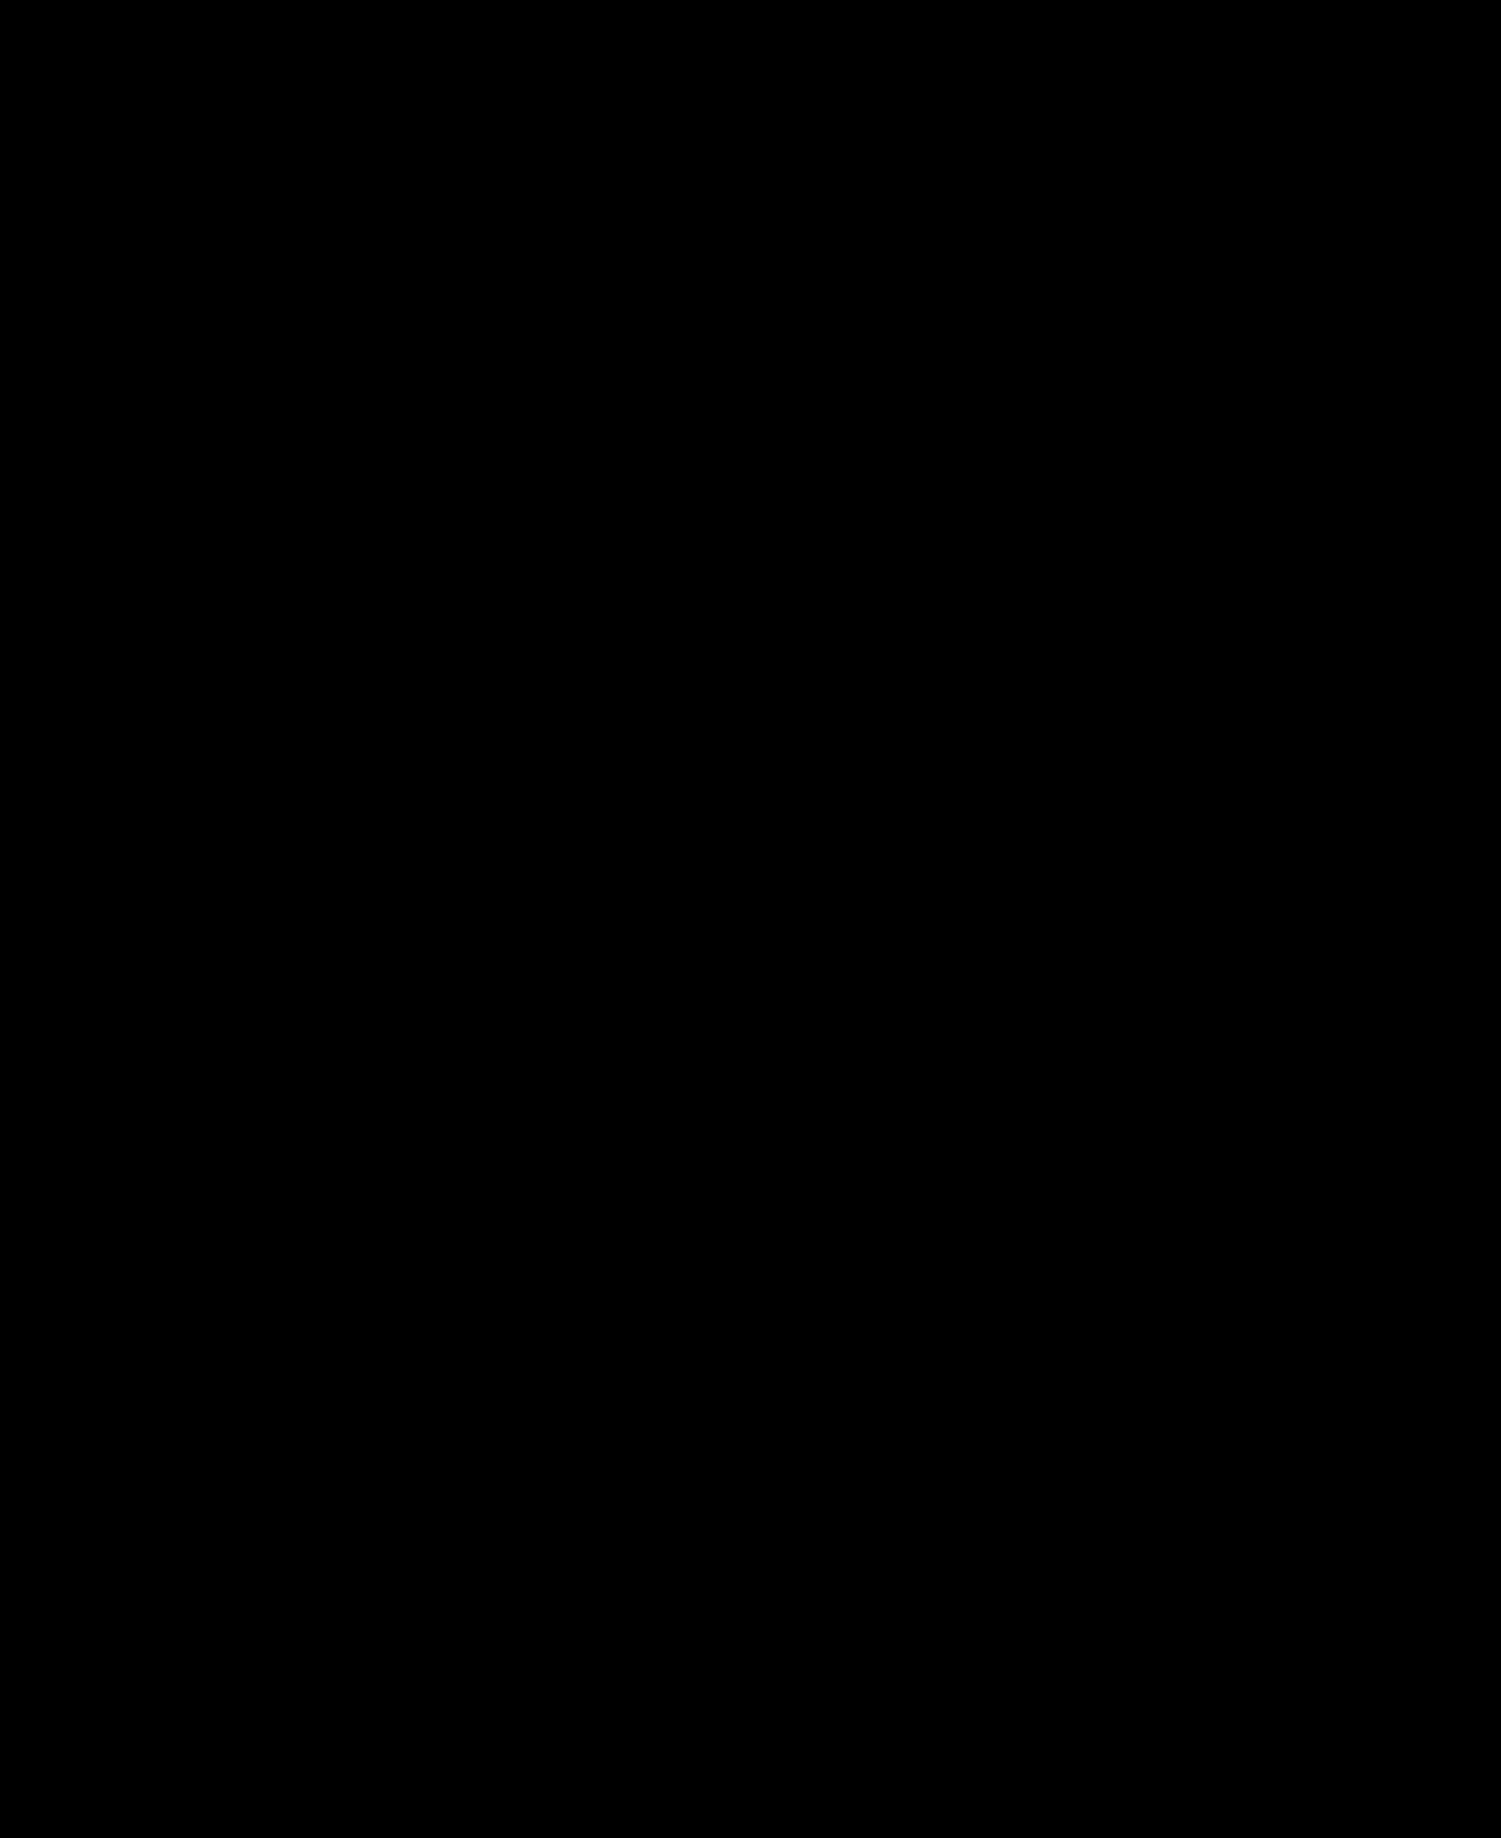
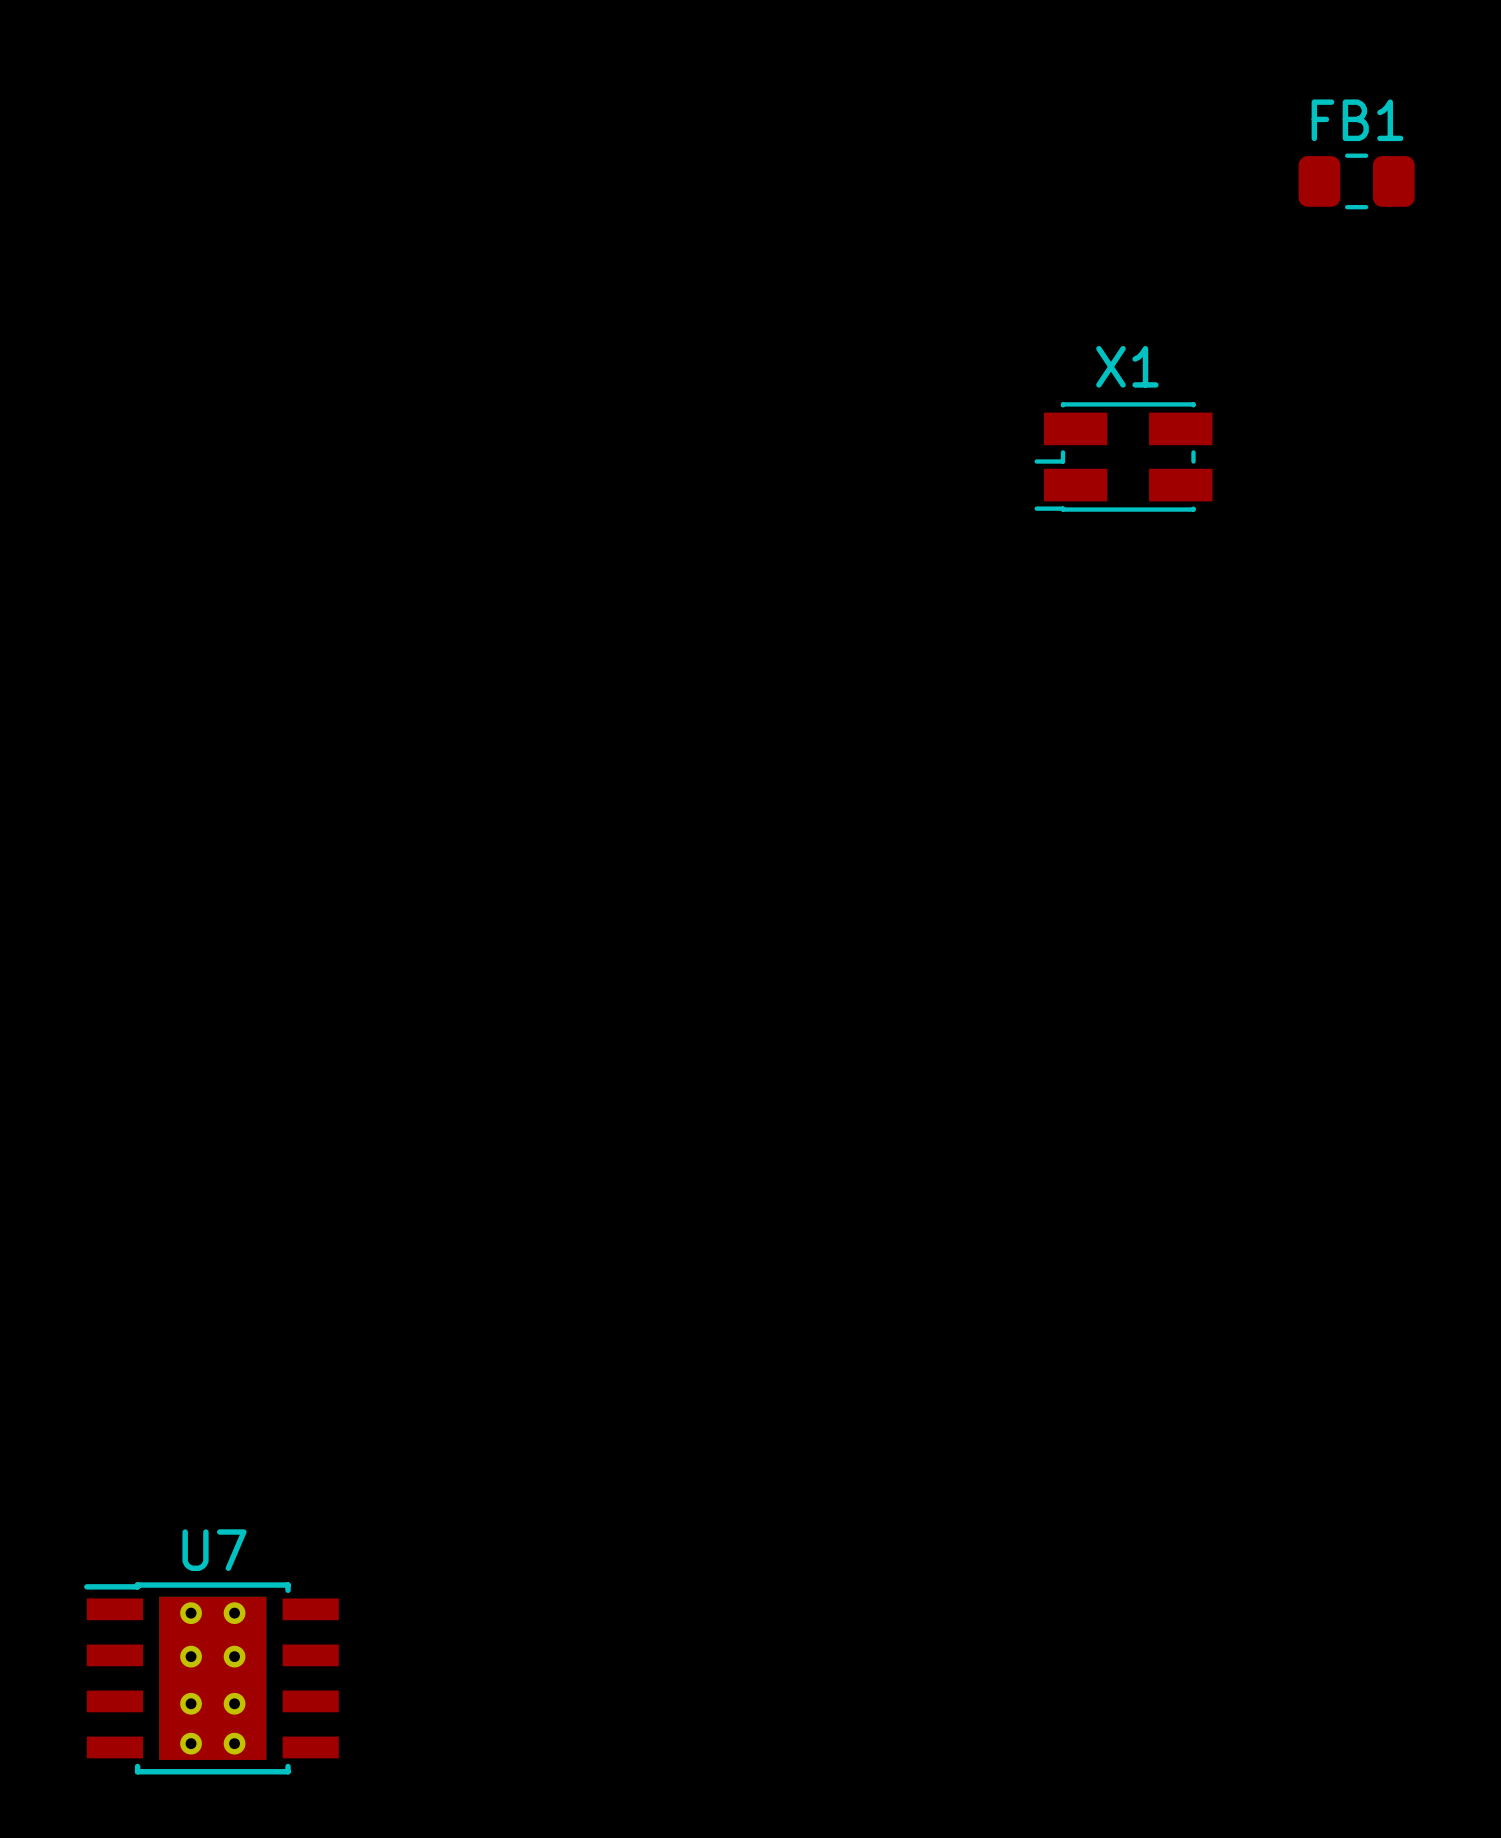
FB1: none -> (1356, 181)
X1: none -> (1123, 456)
U7: none -> (211, 1678)

